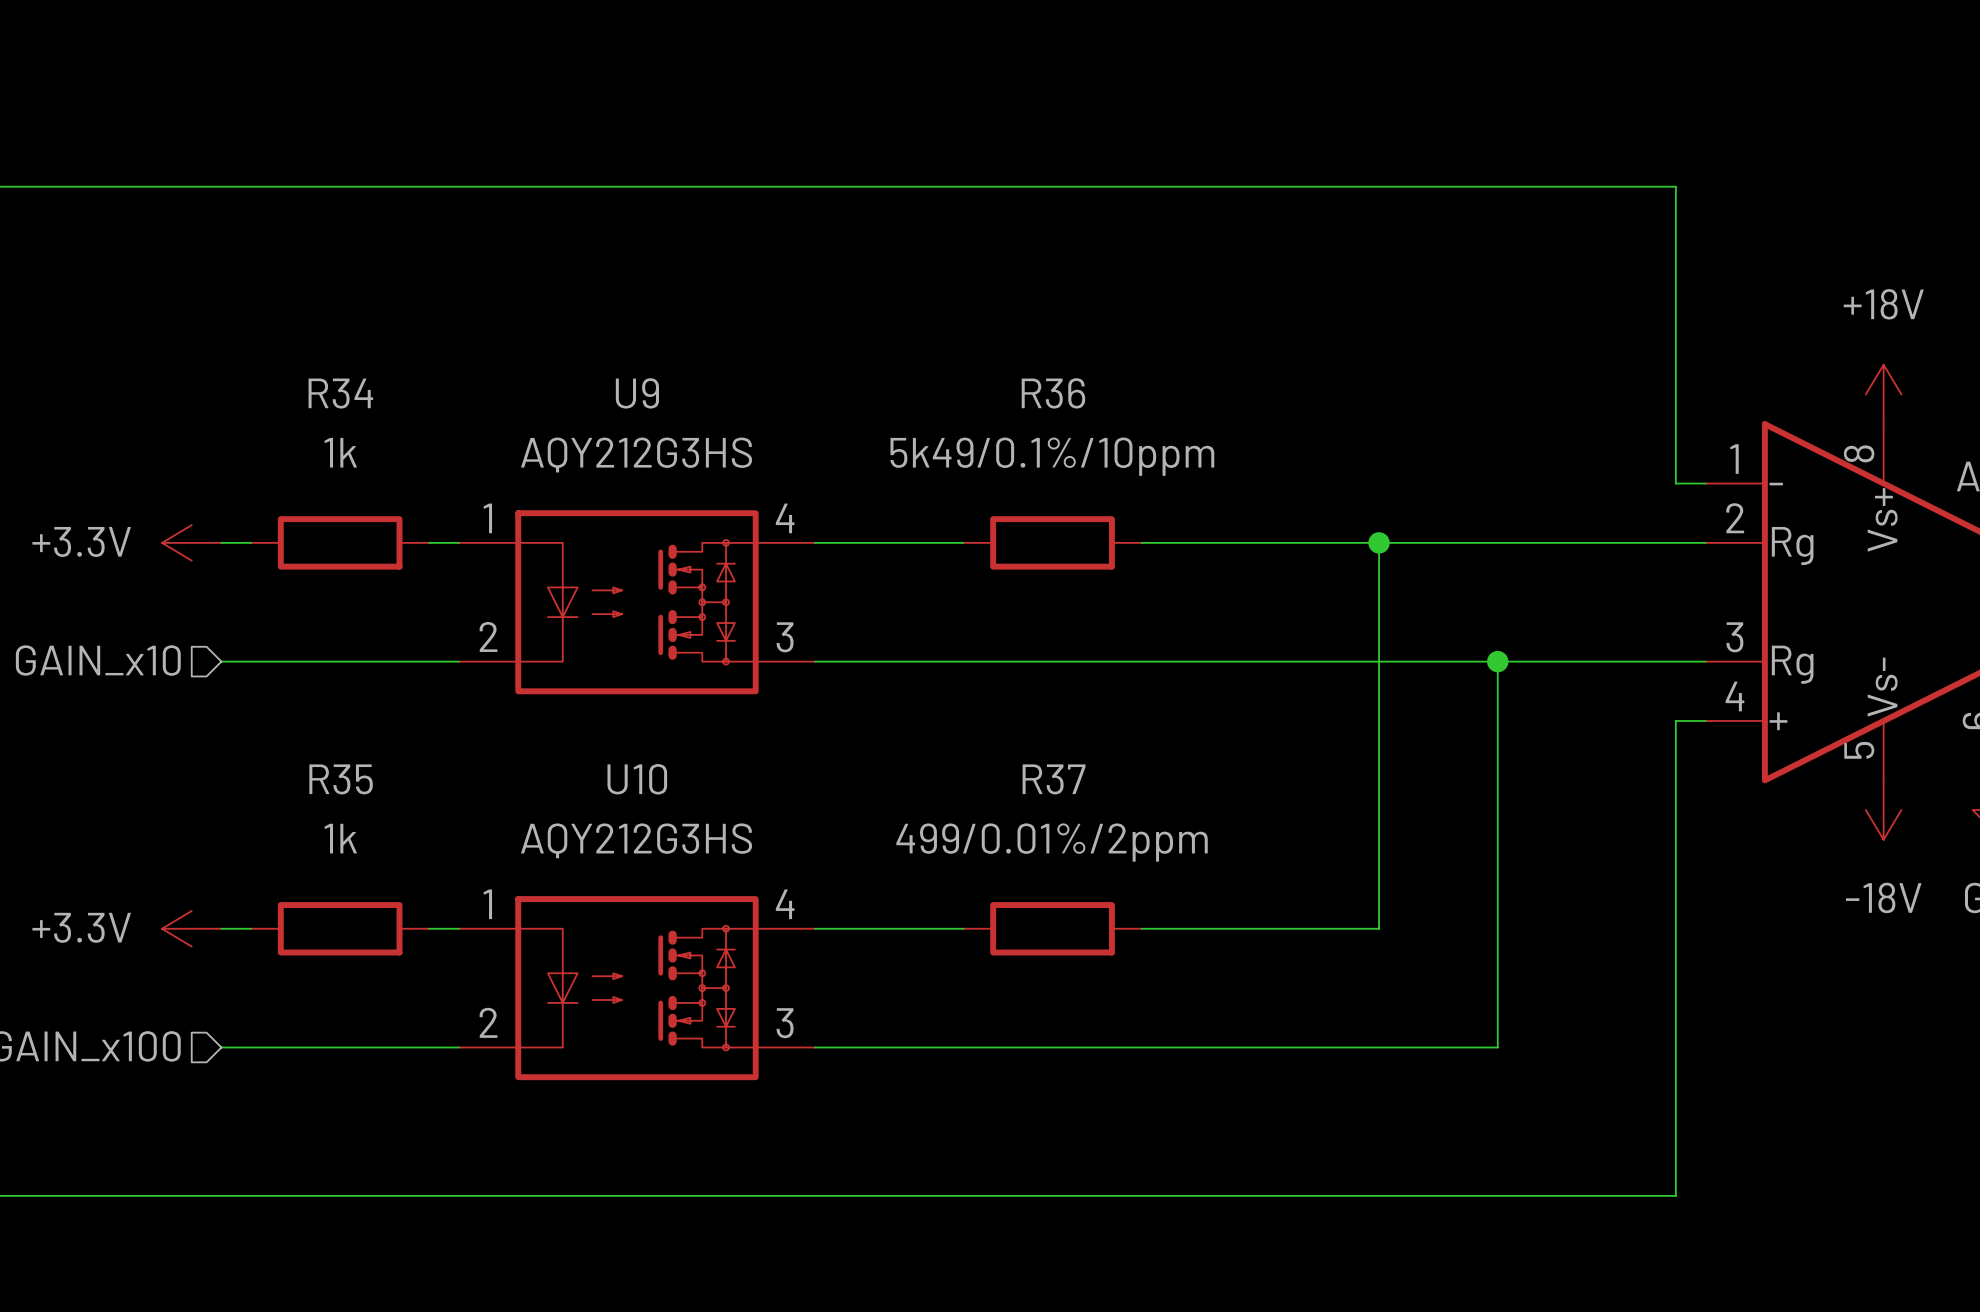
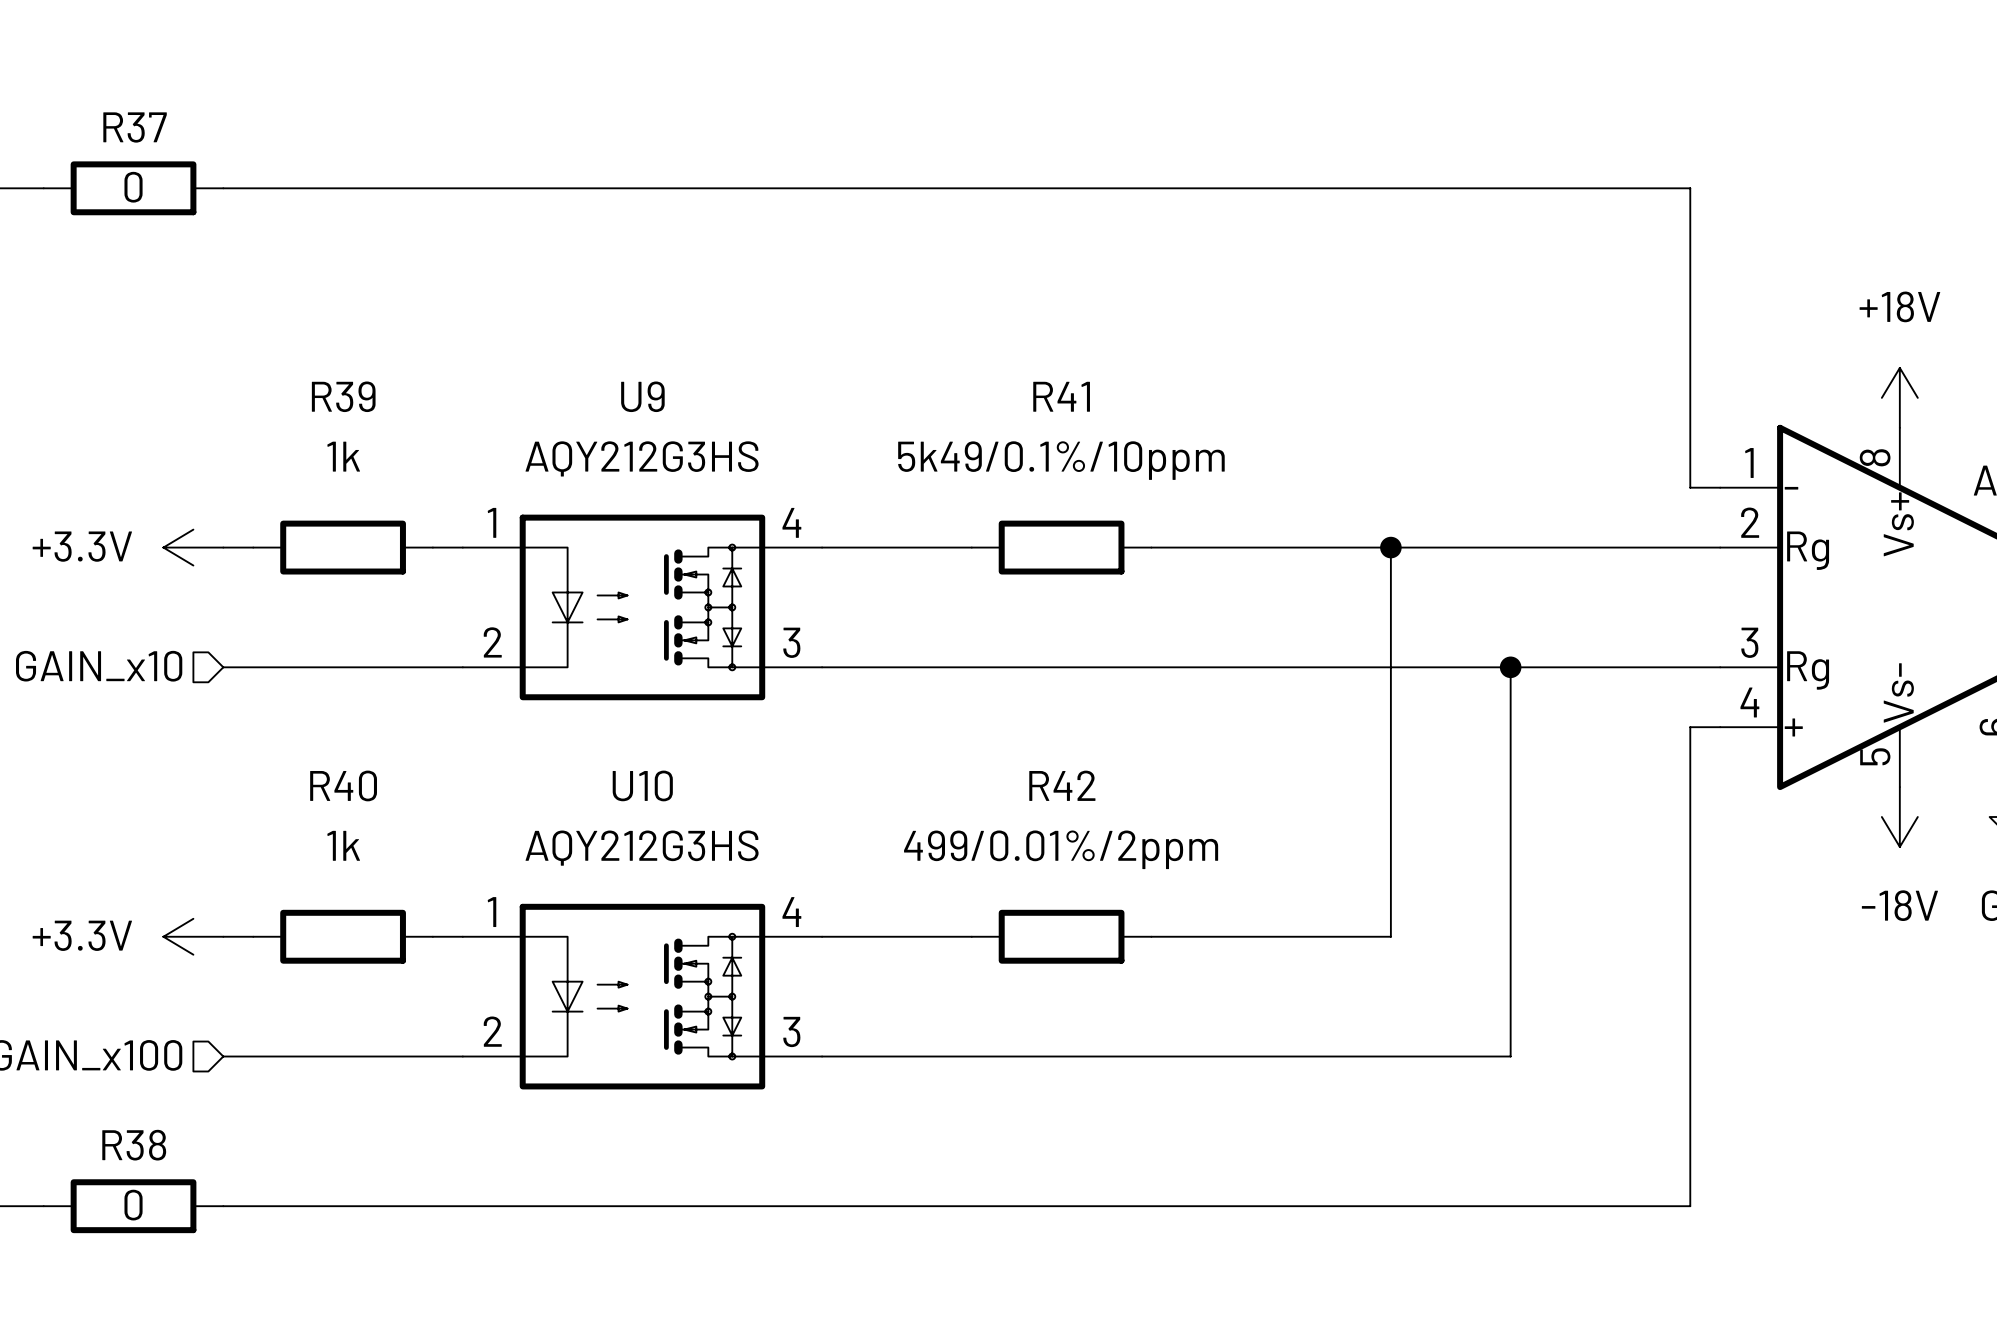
wire: (43, 186) (221, 186) -> none
R37: none -> 0 (133, 188)
R34 name: R34 (340, 393) -> R39 (343, 396)
R36 name: R36 (1053, 393) -> R41 (1061, 396)
R35 name: R35 (341, 779) -> R40 (343, 785)
R37 name: R37 (1054, 779) -> R42 (1062, 785)
wire: (43, 1195) (221, 1195) -> none
R38: none -> 0 (133, 1206)

